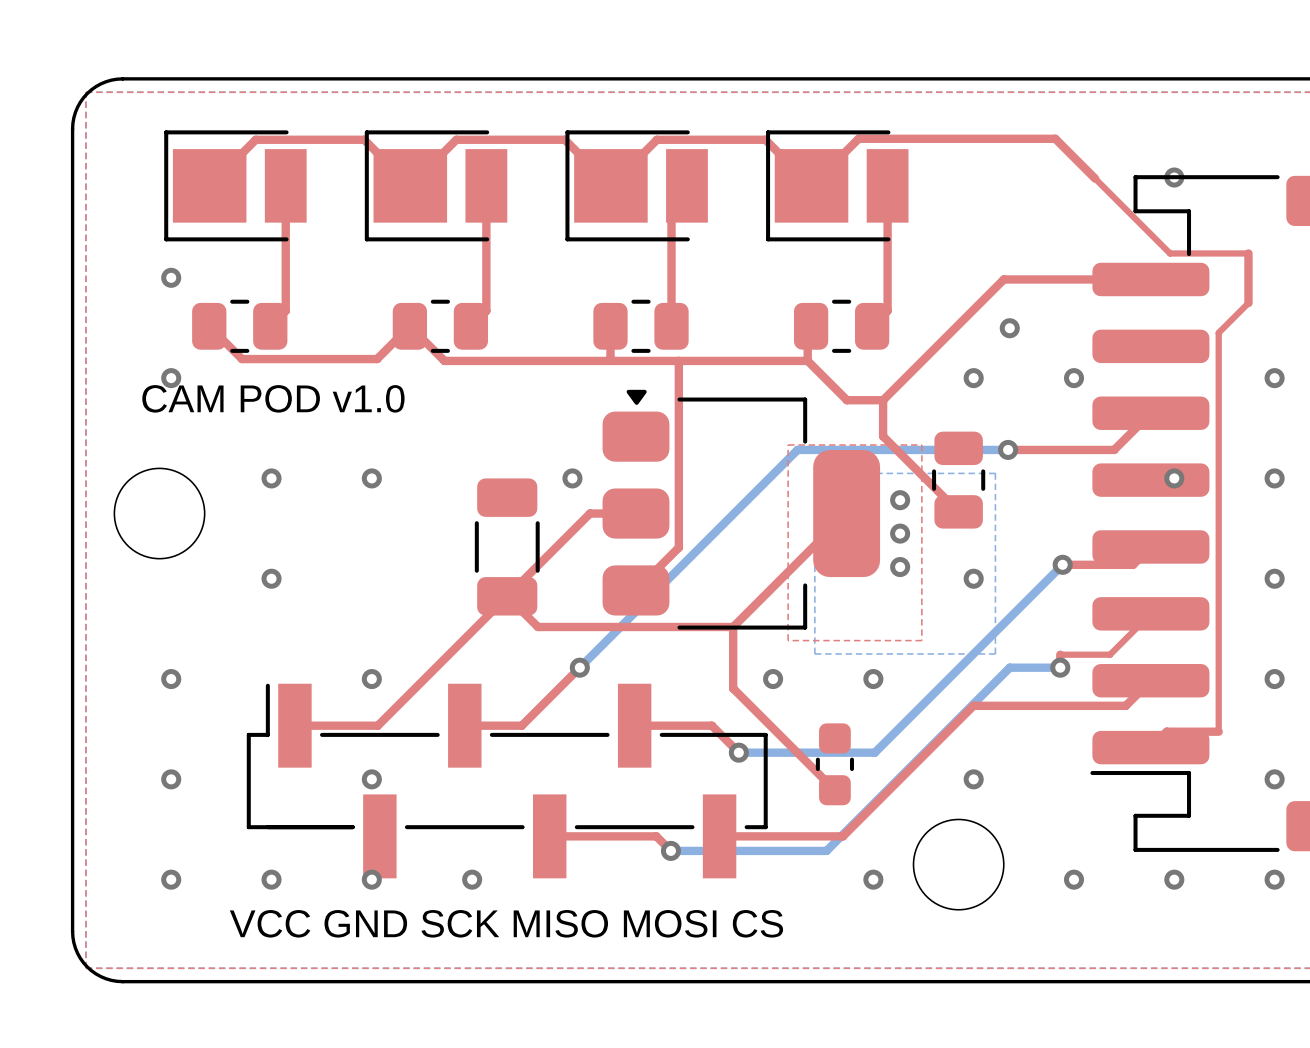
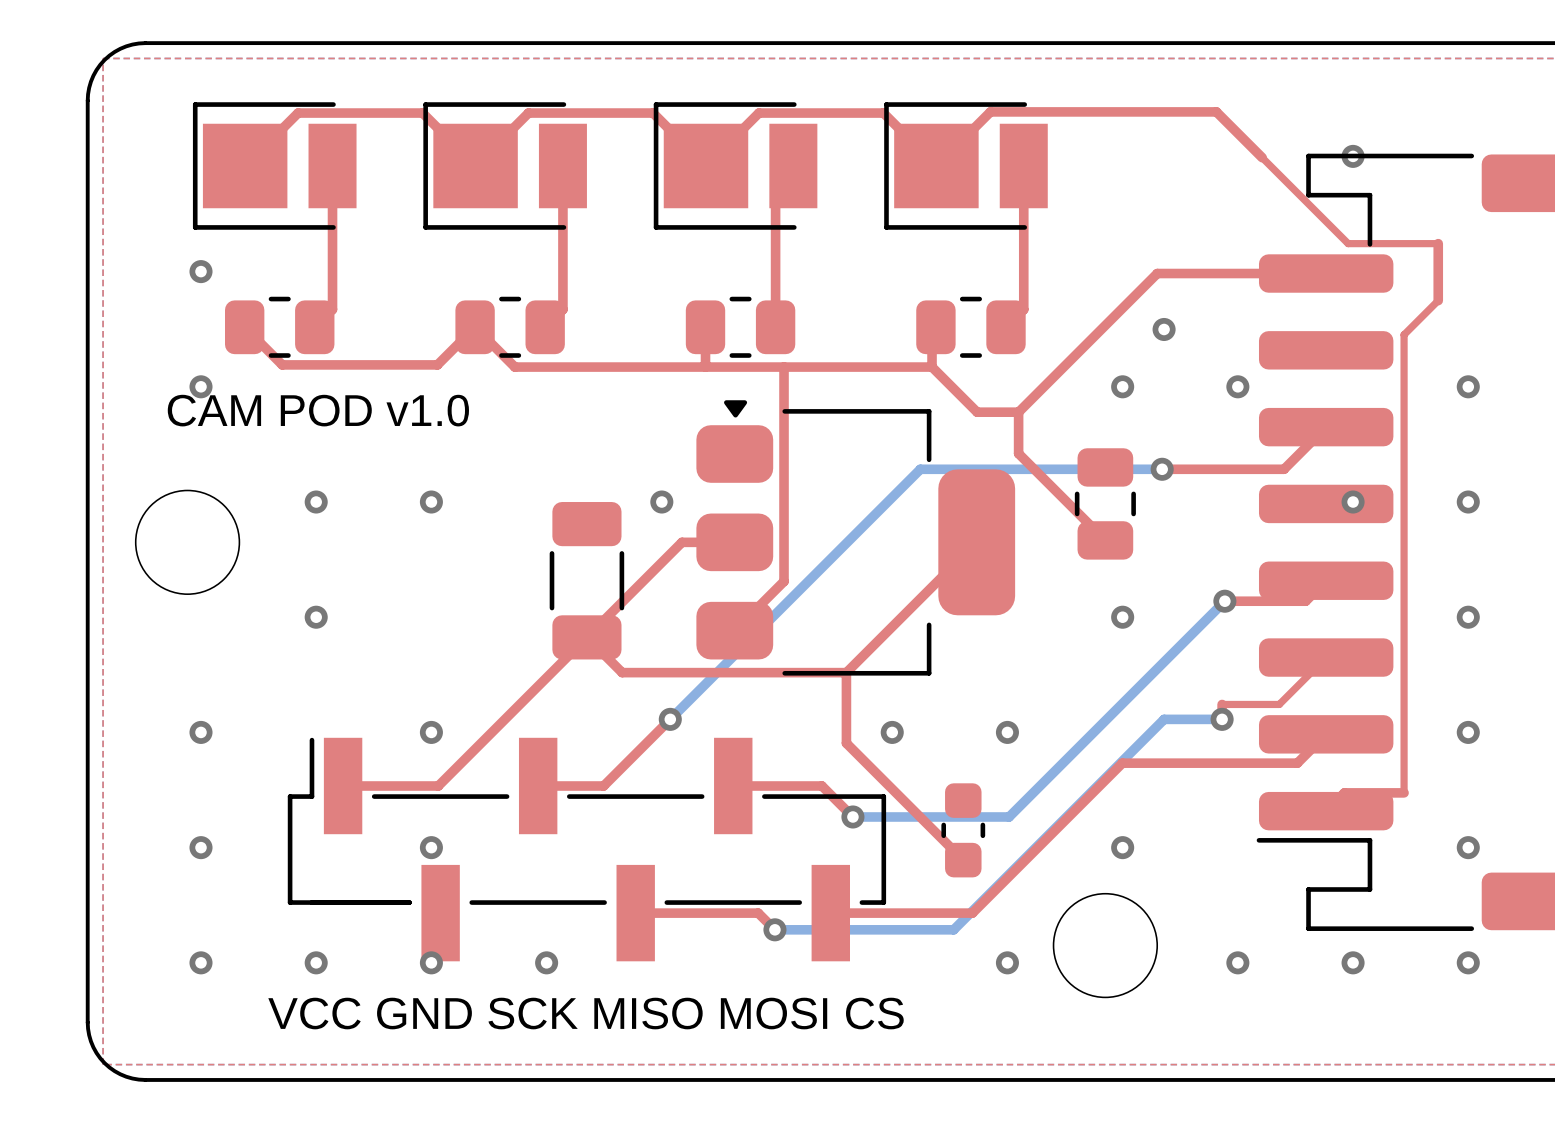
top zone outline: (788, 445) (921, 445) (921, 640) (788, 640) (788, 445) -> none
bottom zone outline: (814, 473) (995, 473) (995, 653) (814, 653) (814, 473) -> none
via: (900, 500) -> none
via: (900, 533) -> none
via: (900, 567) -> none

